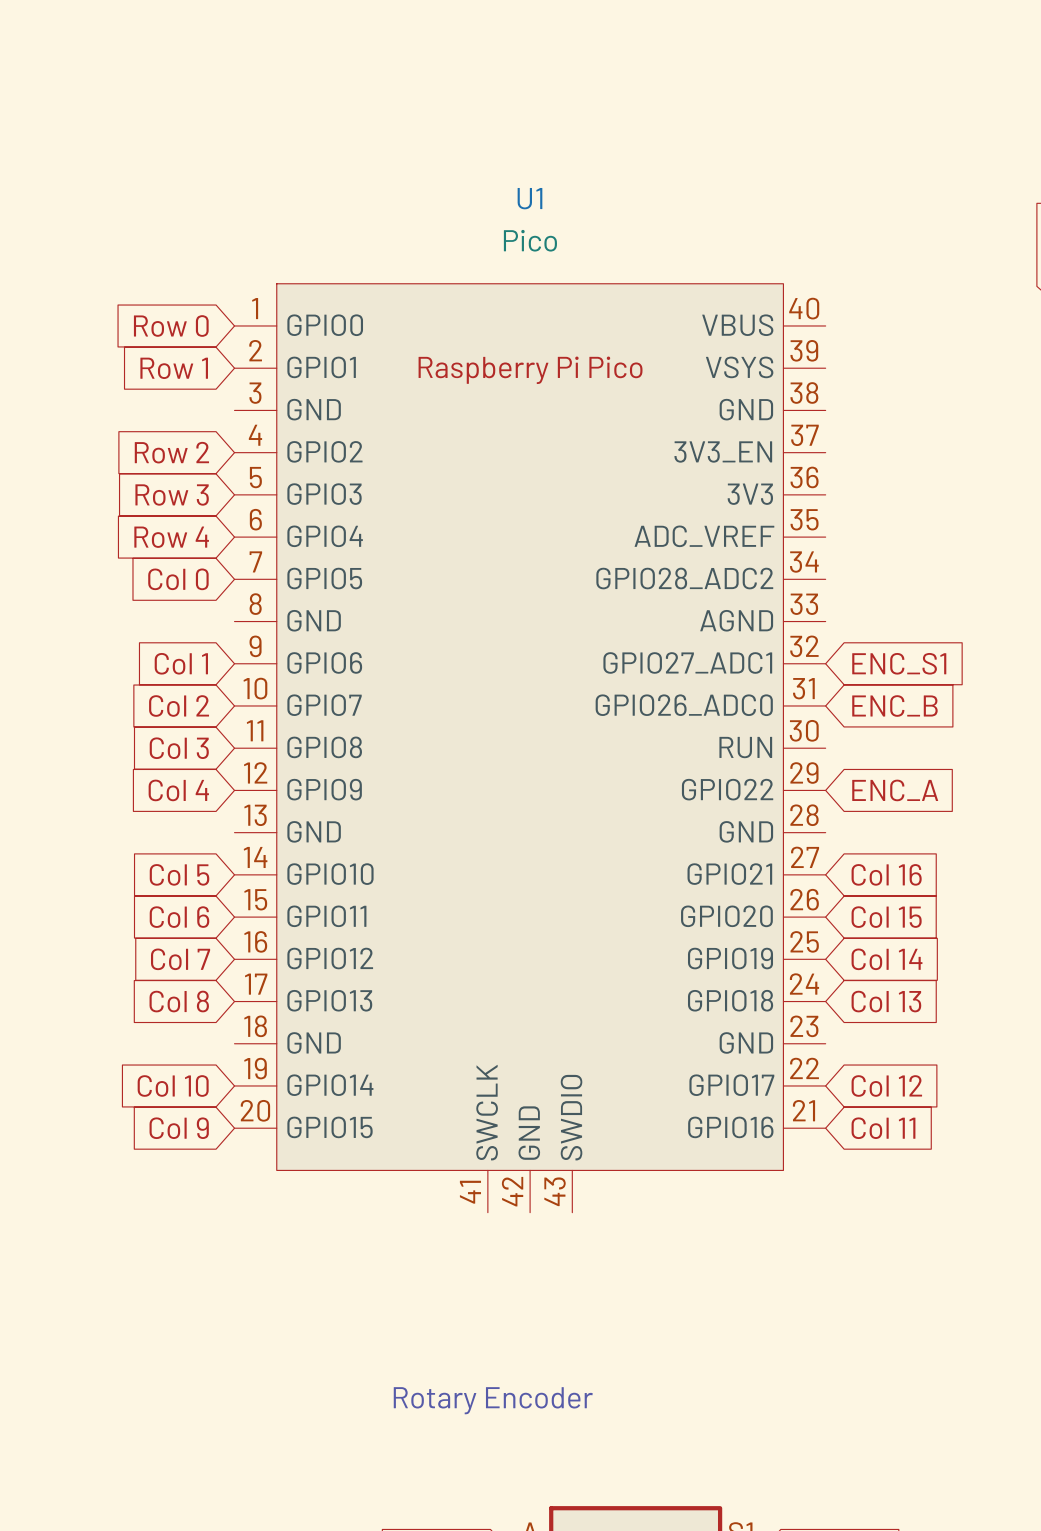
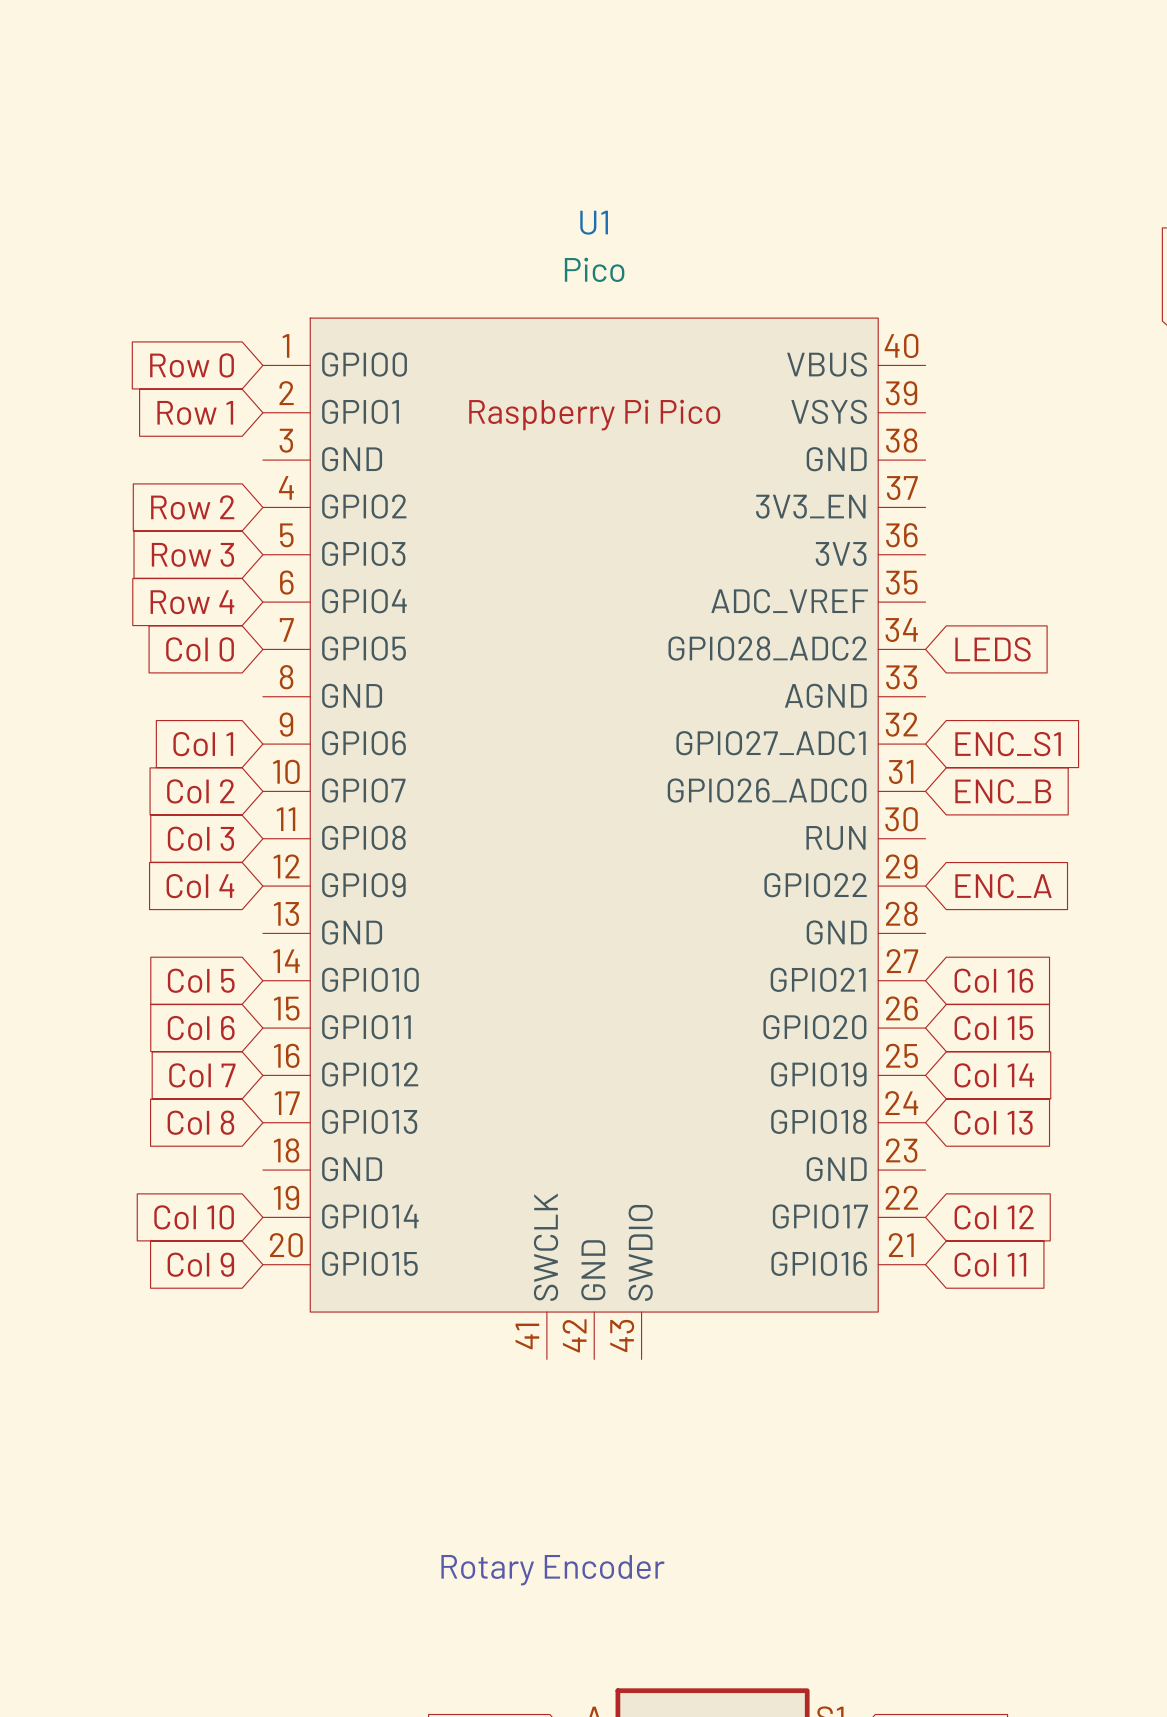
global label: none -> LEDS (992, 649)

